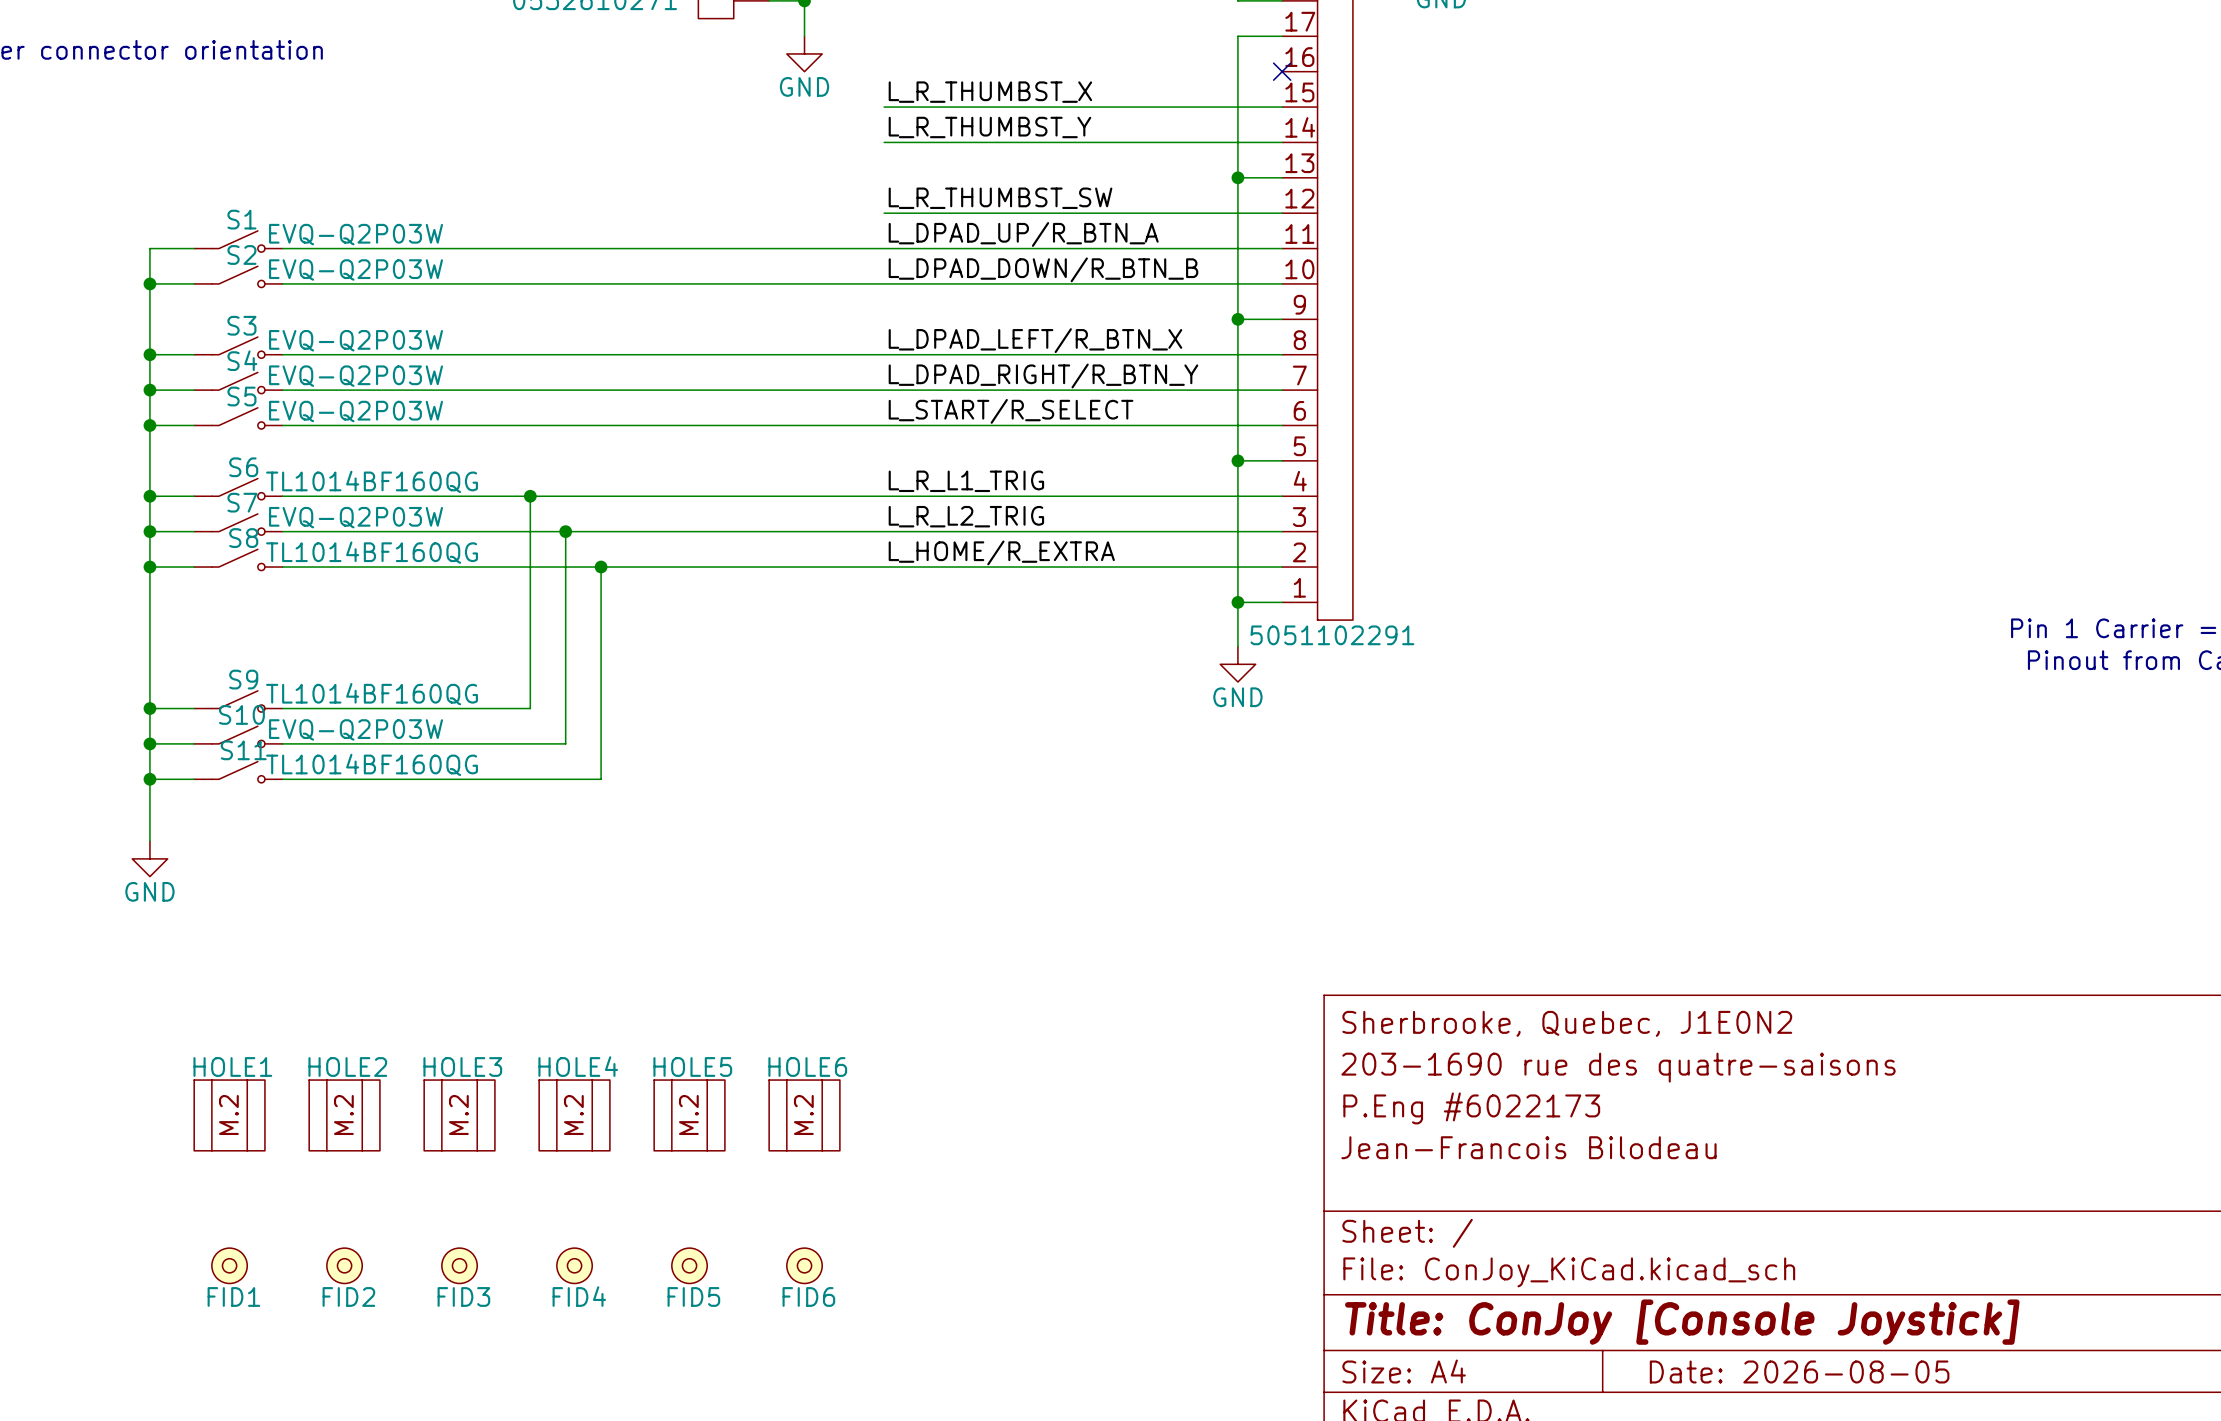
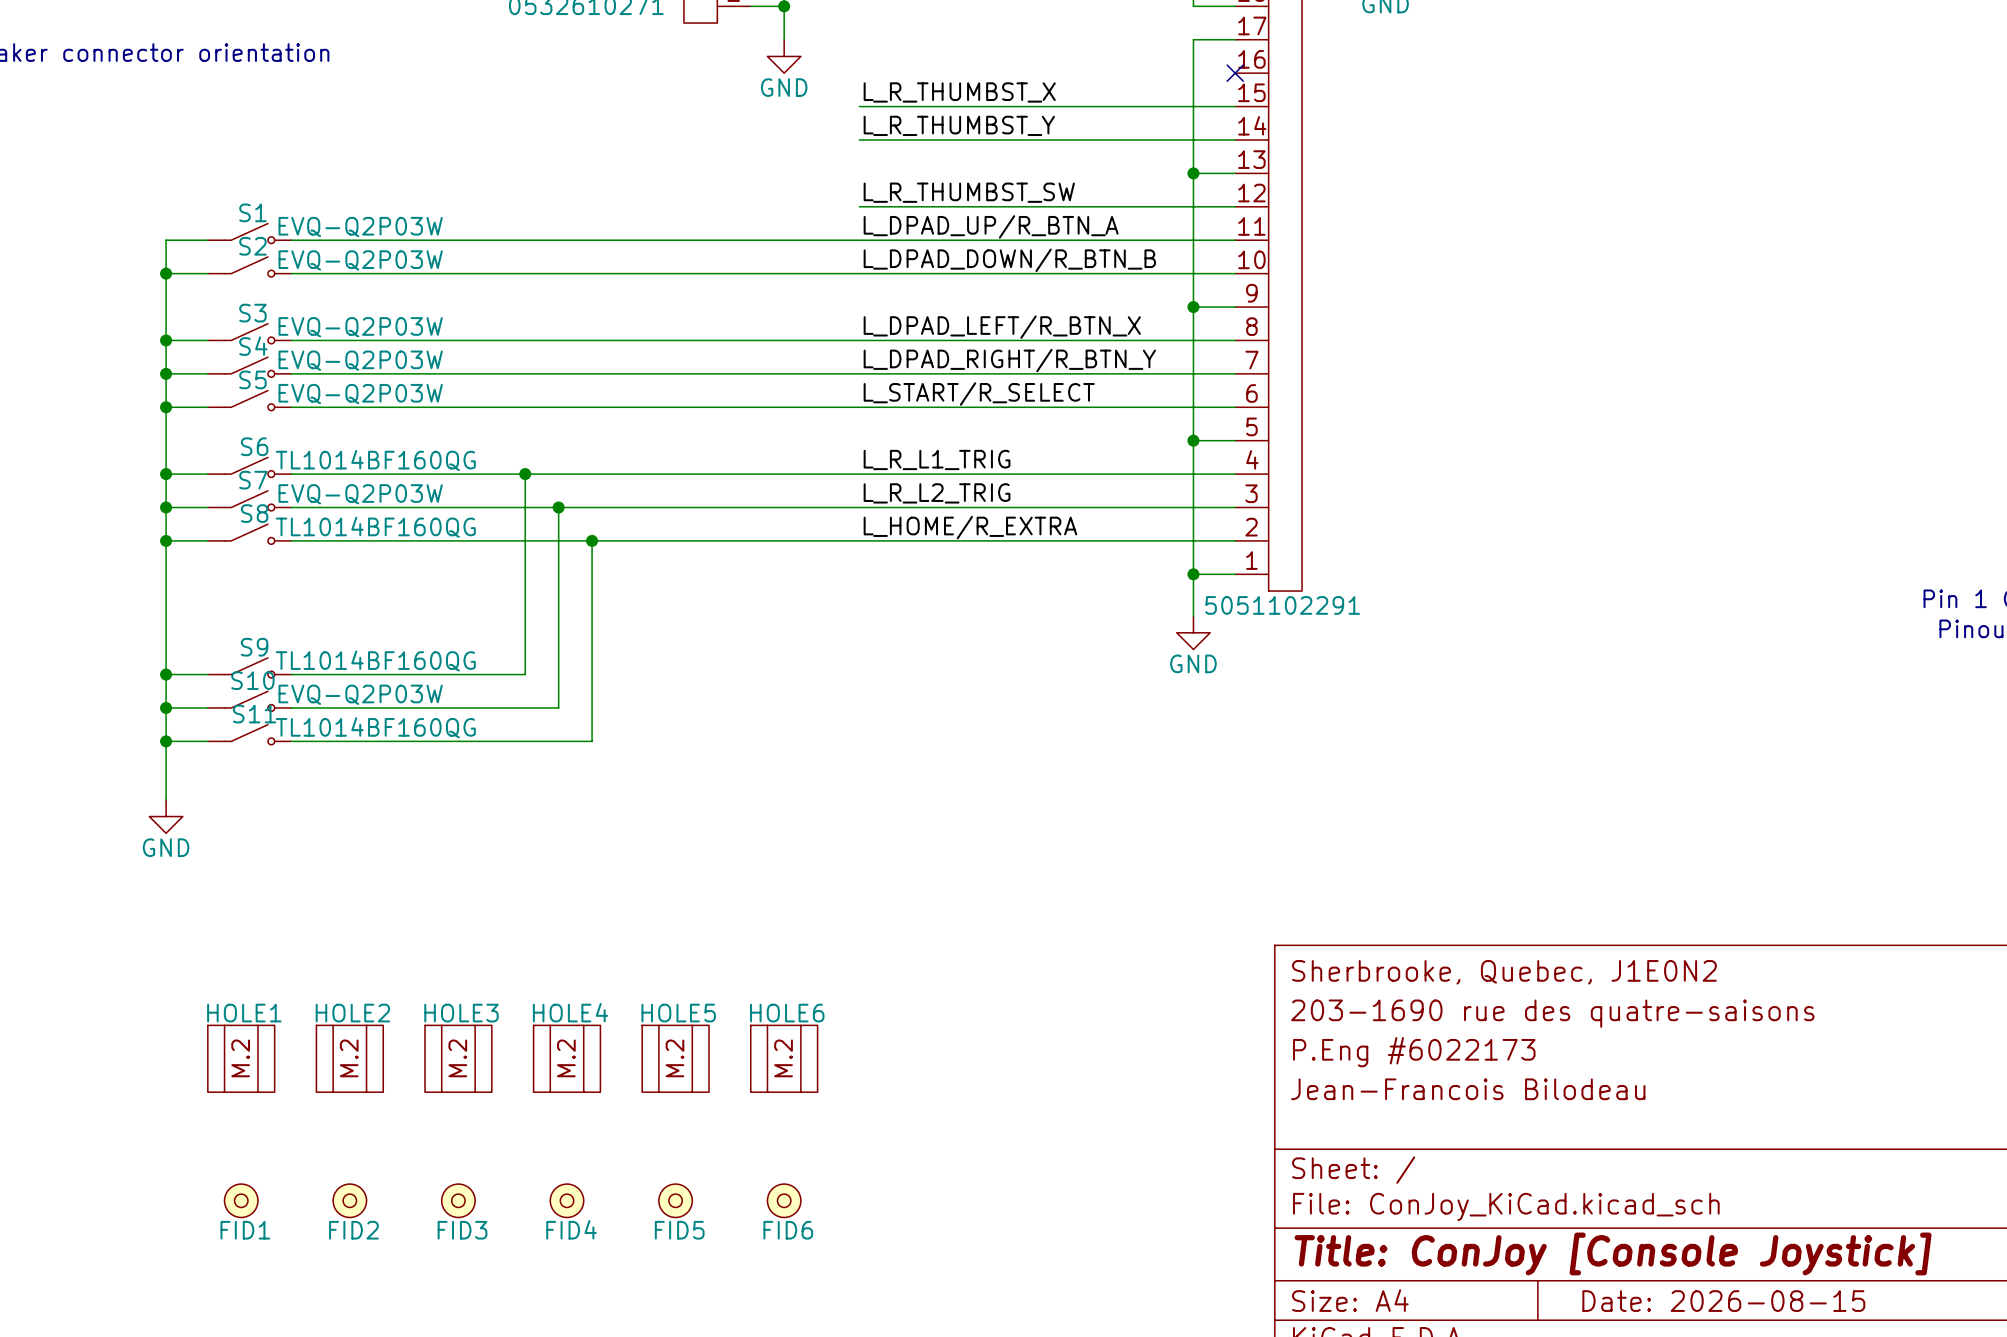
title block: Date: 2026-08-05 (1799, 1371) -> Date: 2026-08-15 (1723, 1301)

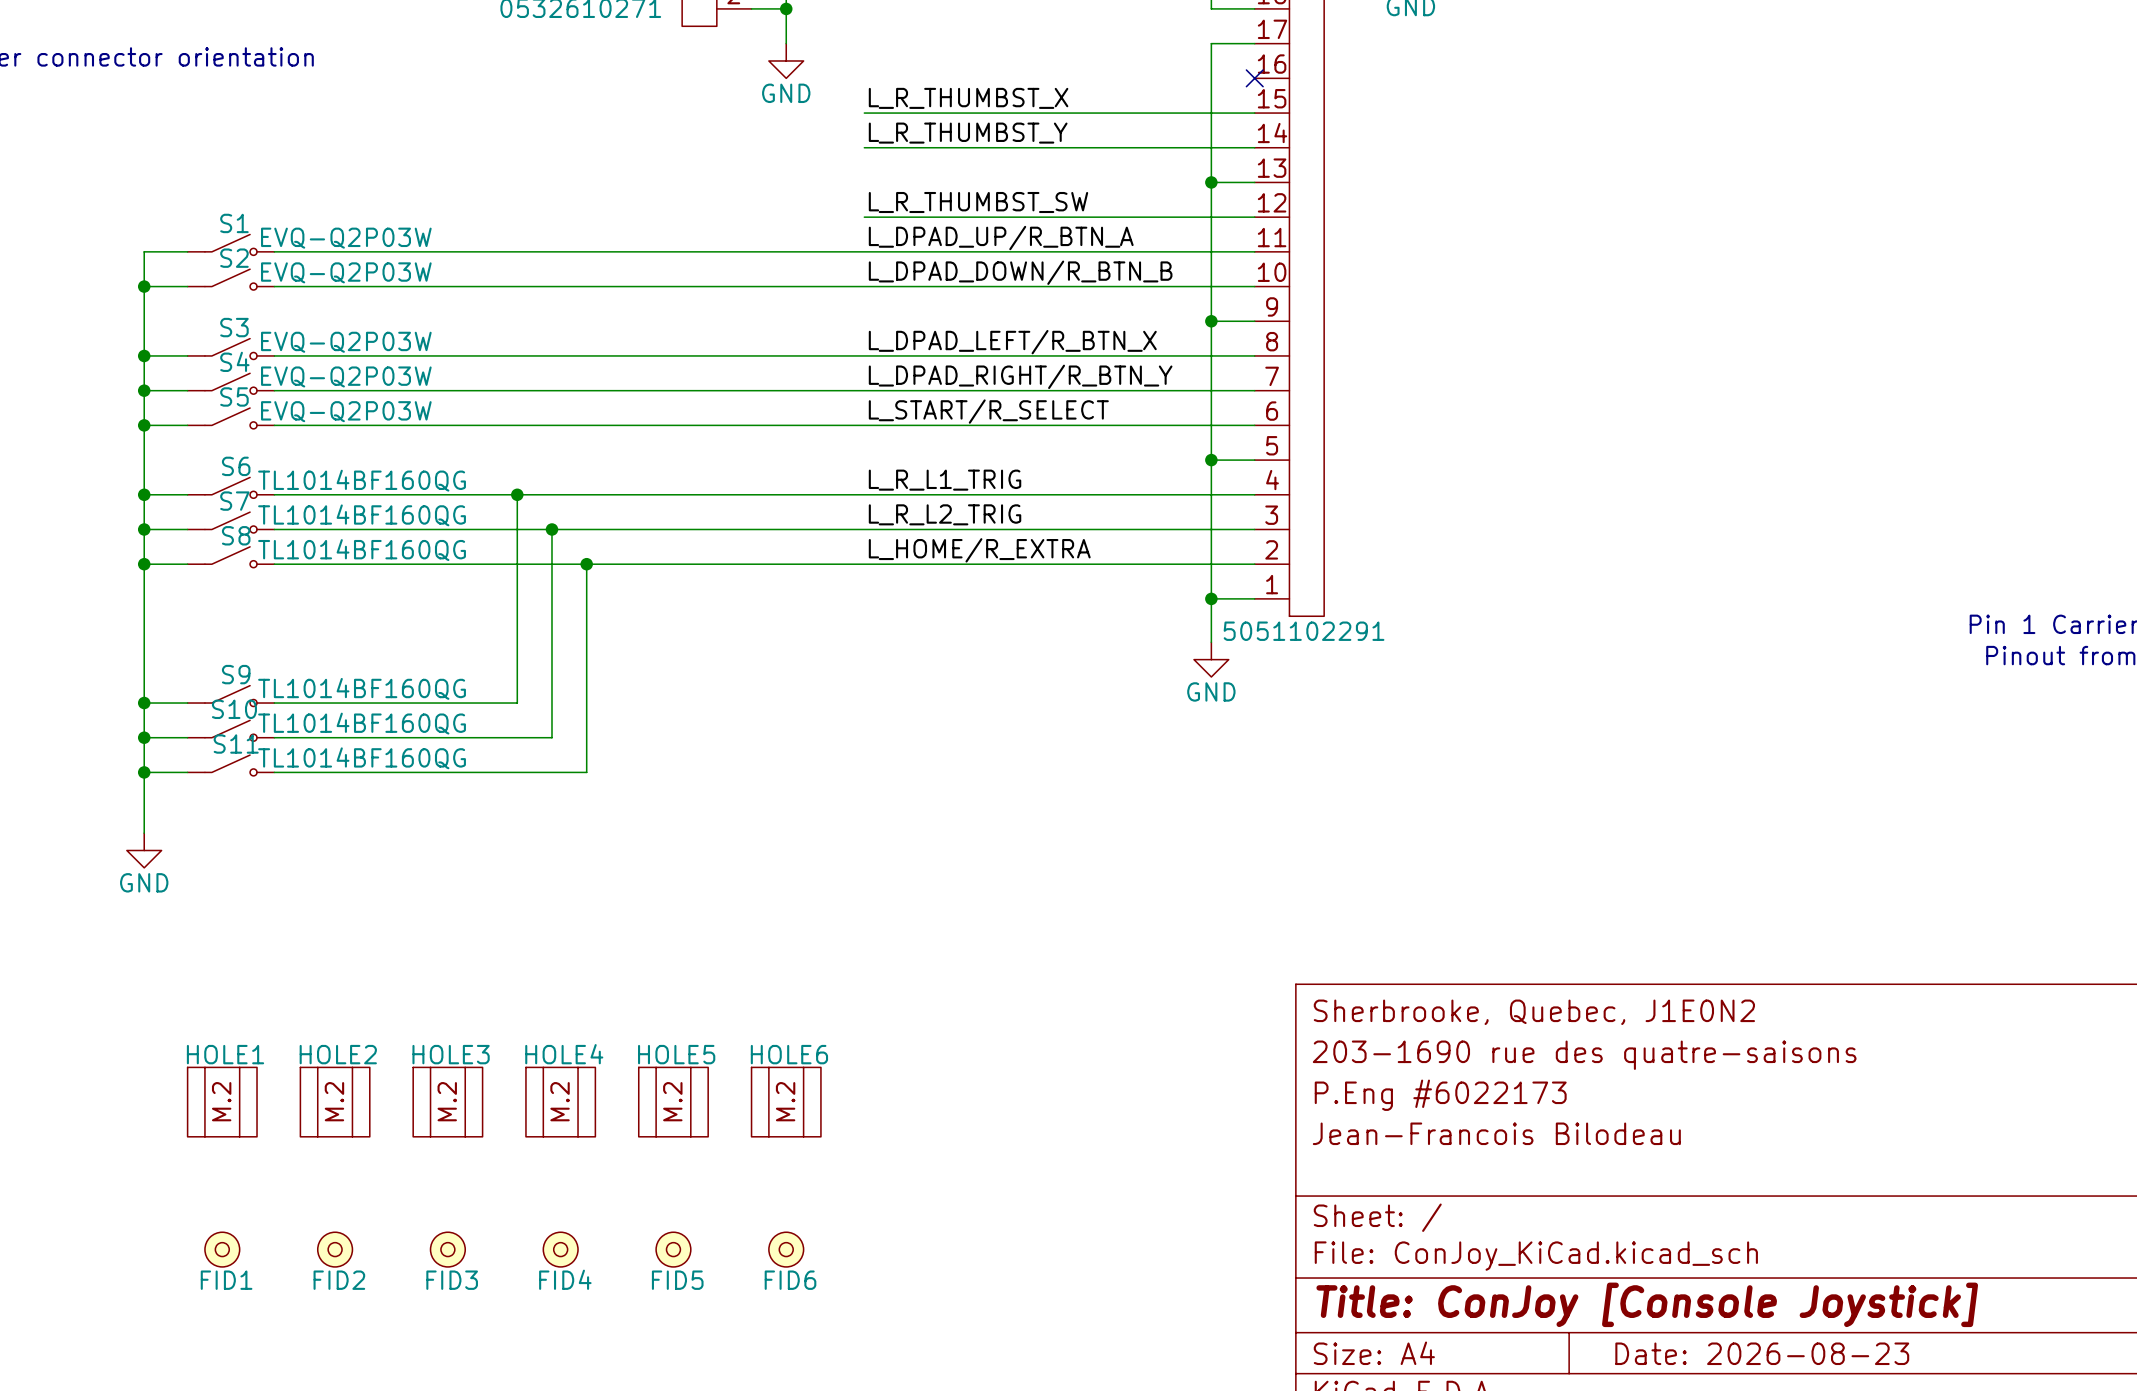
S7 text: EVQ-Q2P03W (360, 494) -> TL1014BF160QG (362, 515)
S10 text: EVQ-Q2P03W (360, 694) -> TL1014BF160QG (362, 723)
title block: Date: 2026-08-15 (1723, 1301) -> Date: 2026-08-23 (1762, 1353)

